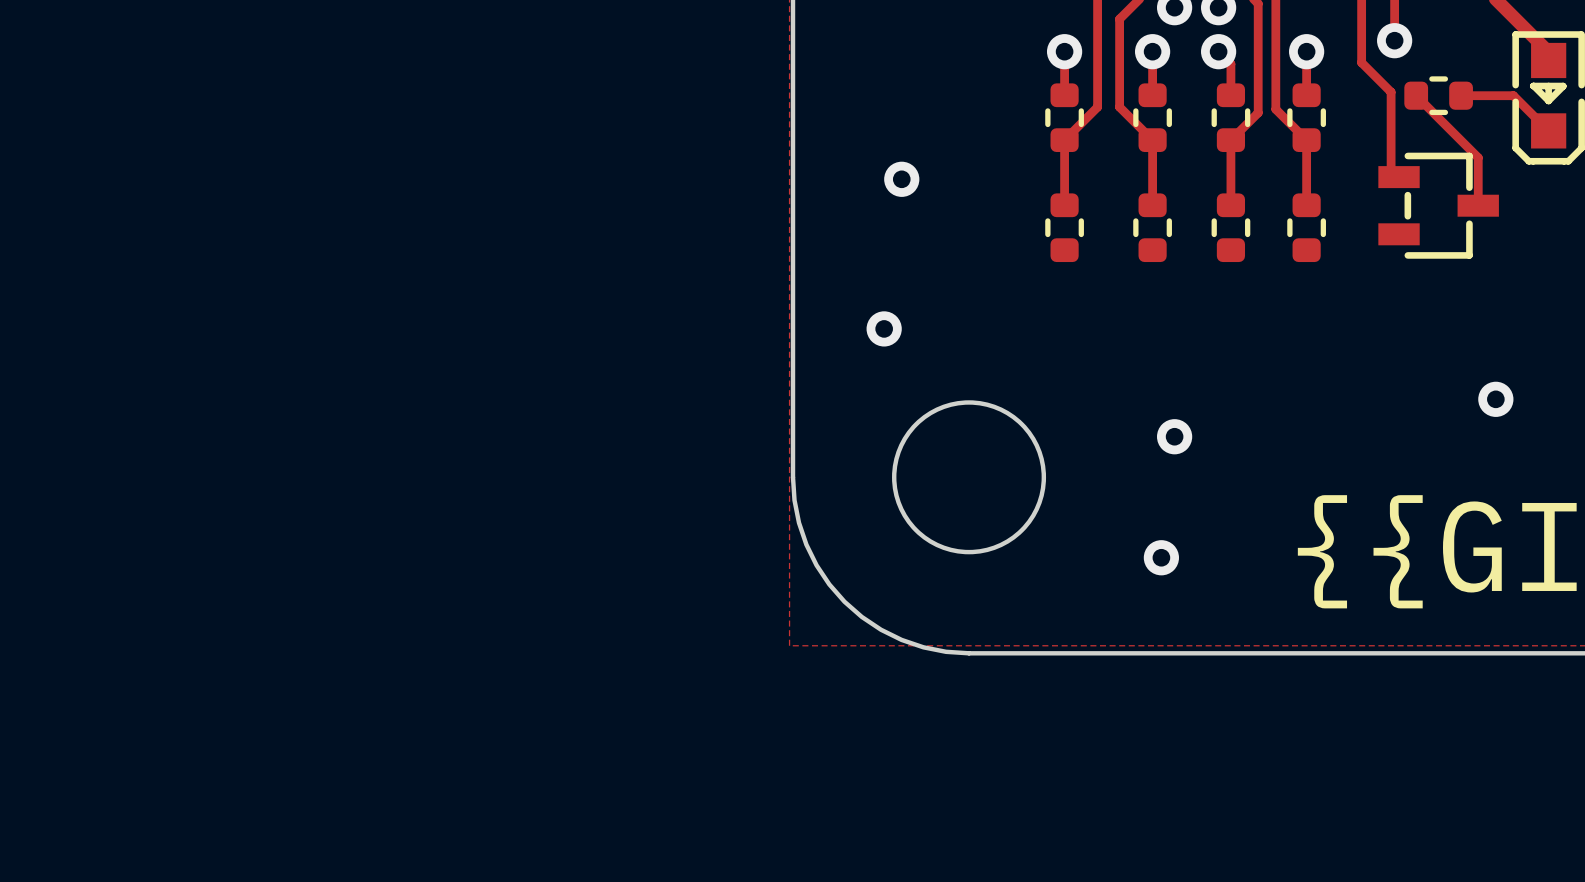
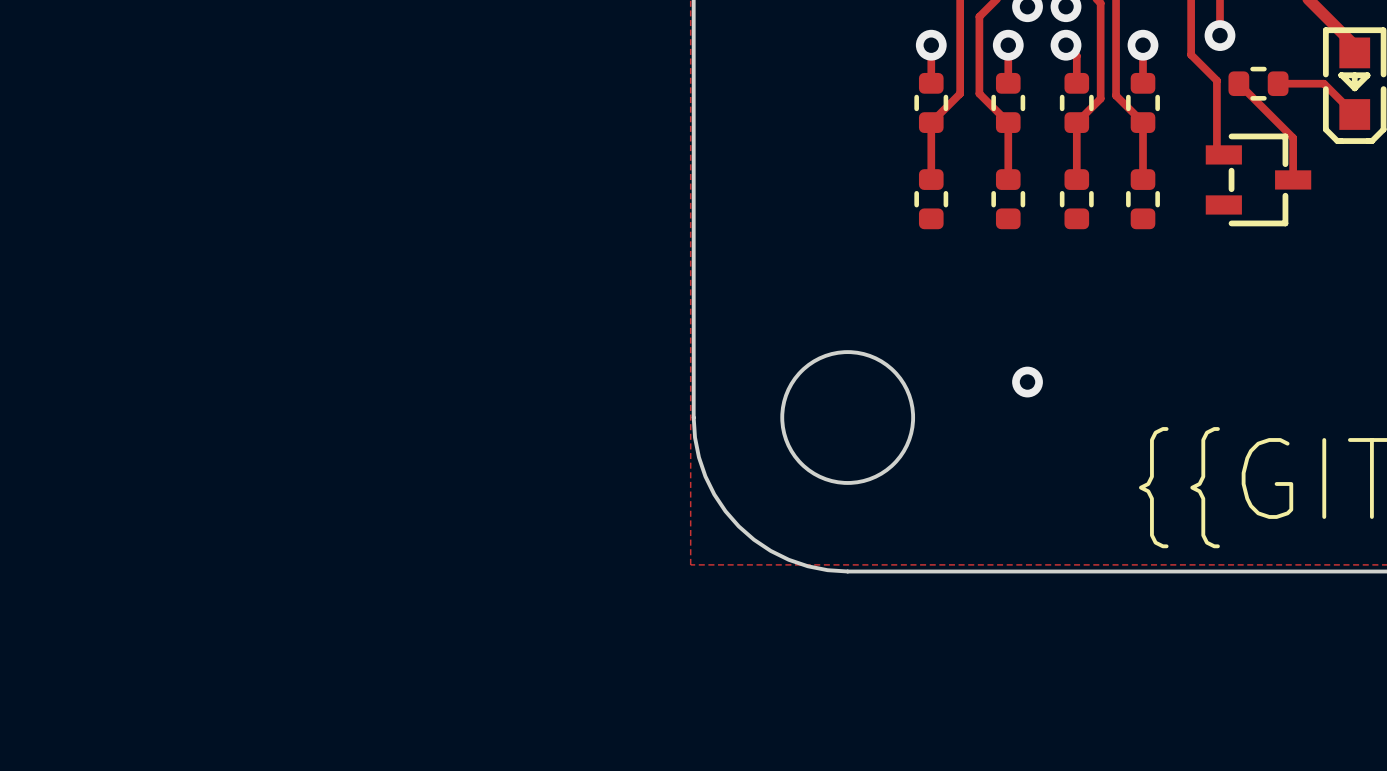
via: (901, 179) -> none
via: (884, 328) -> none
via: (1495, 399) -> none
via: (1161, 557) -> none

